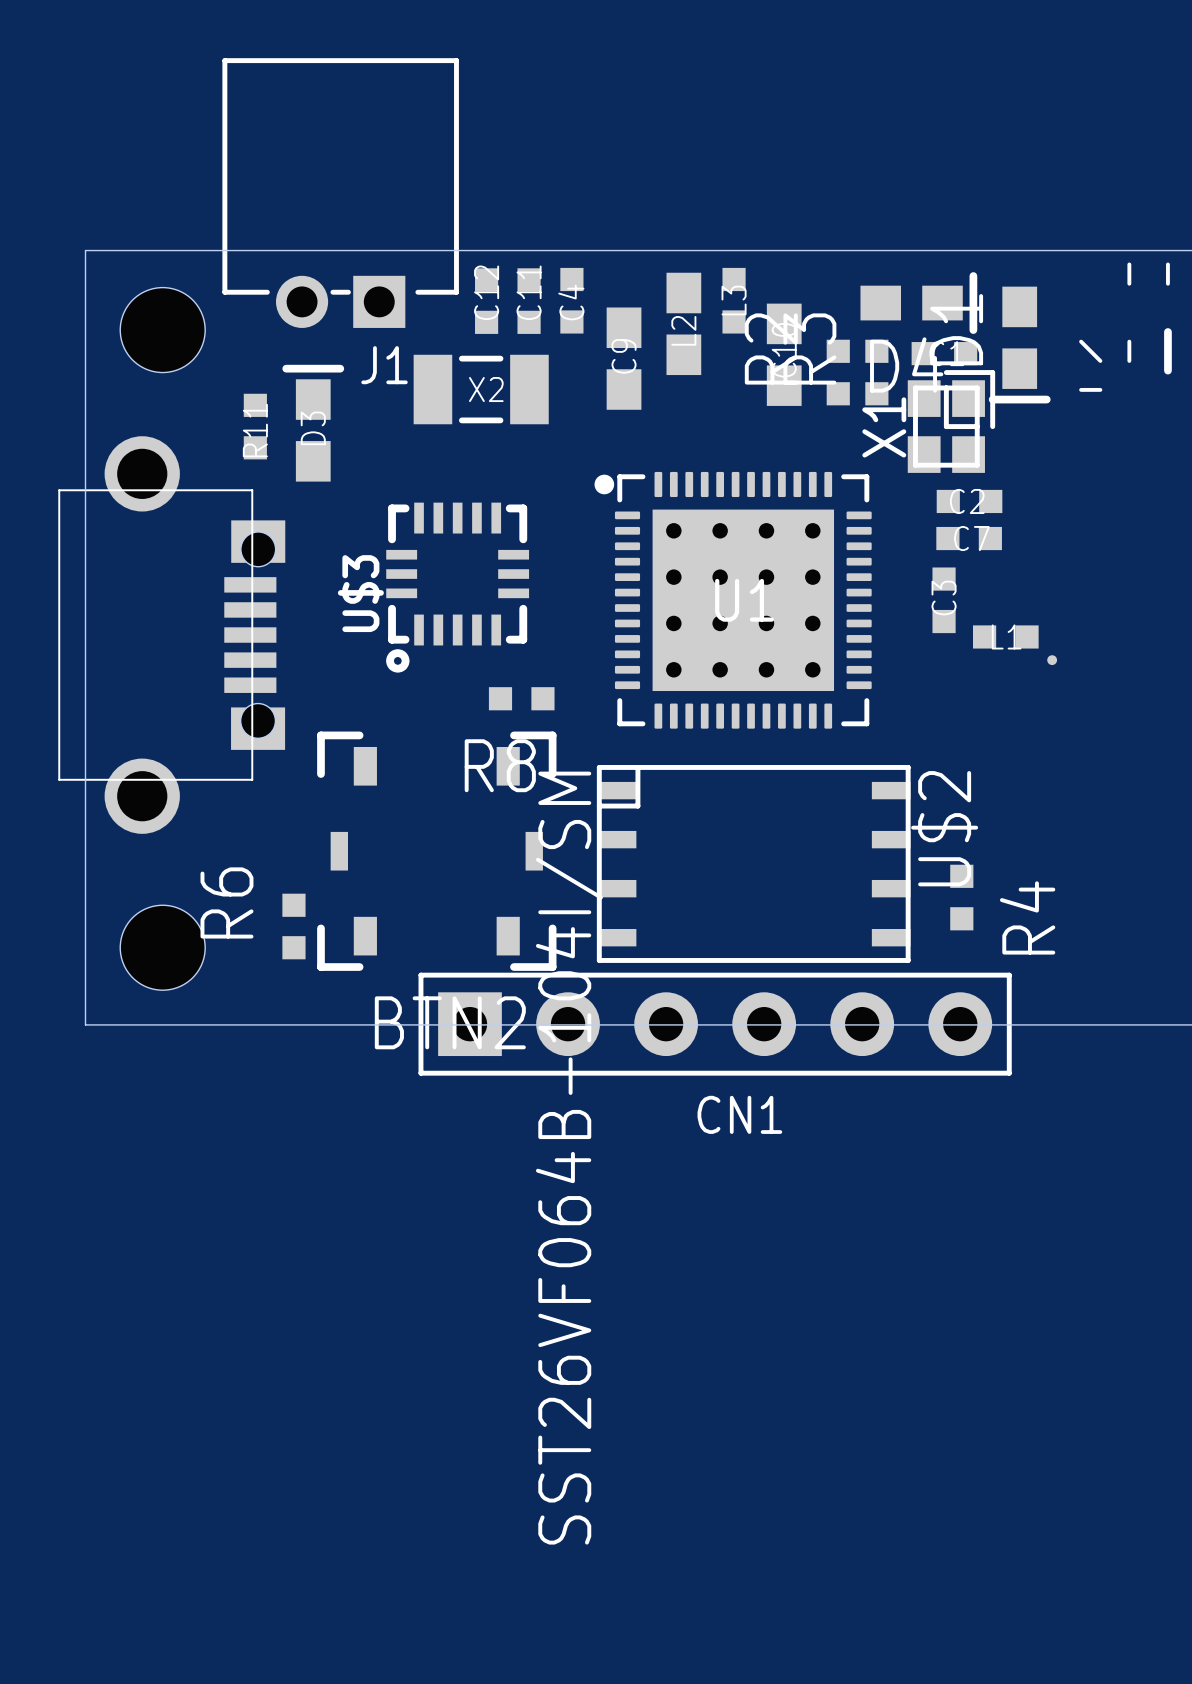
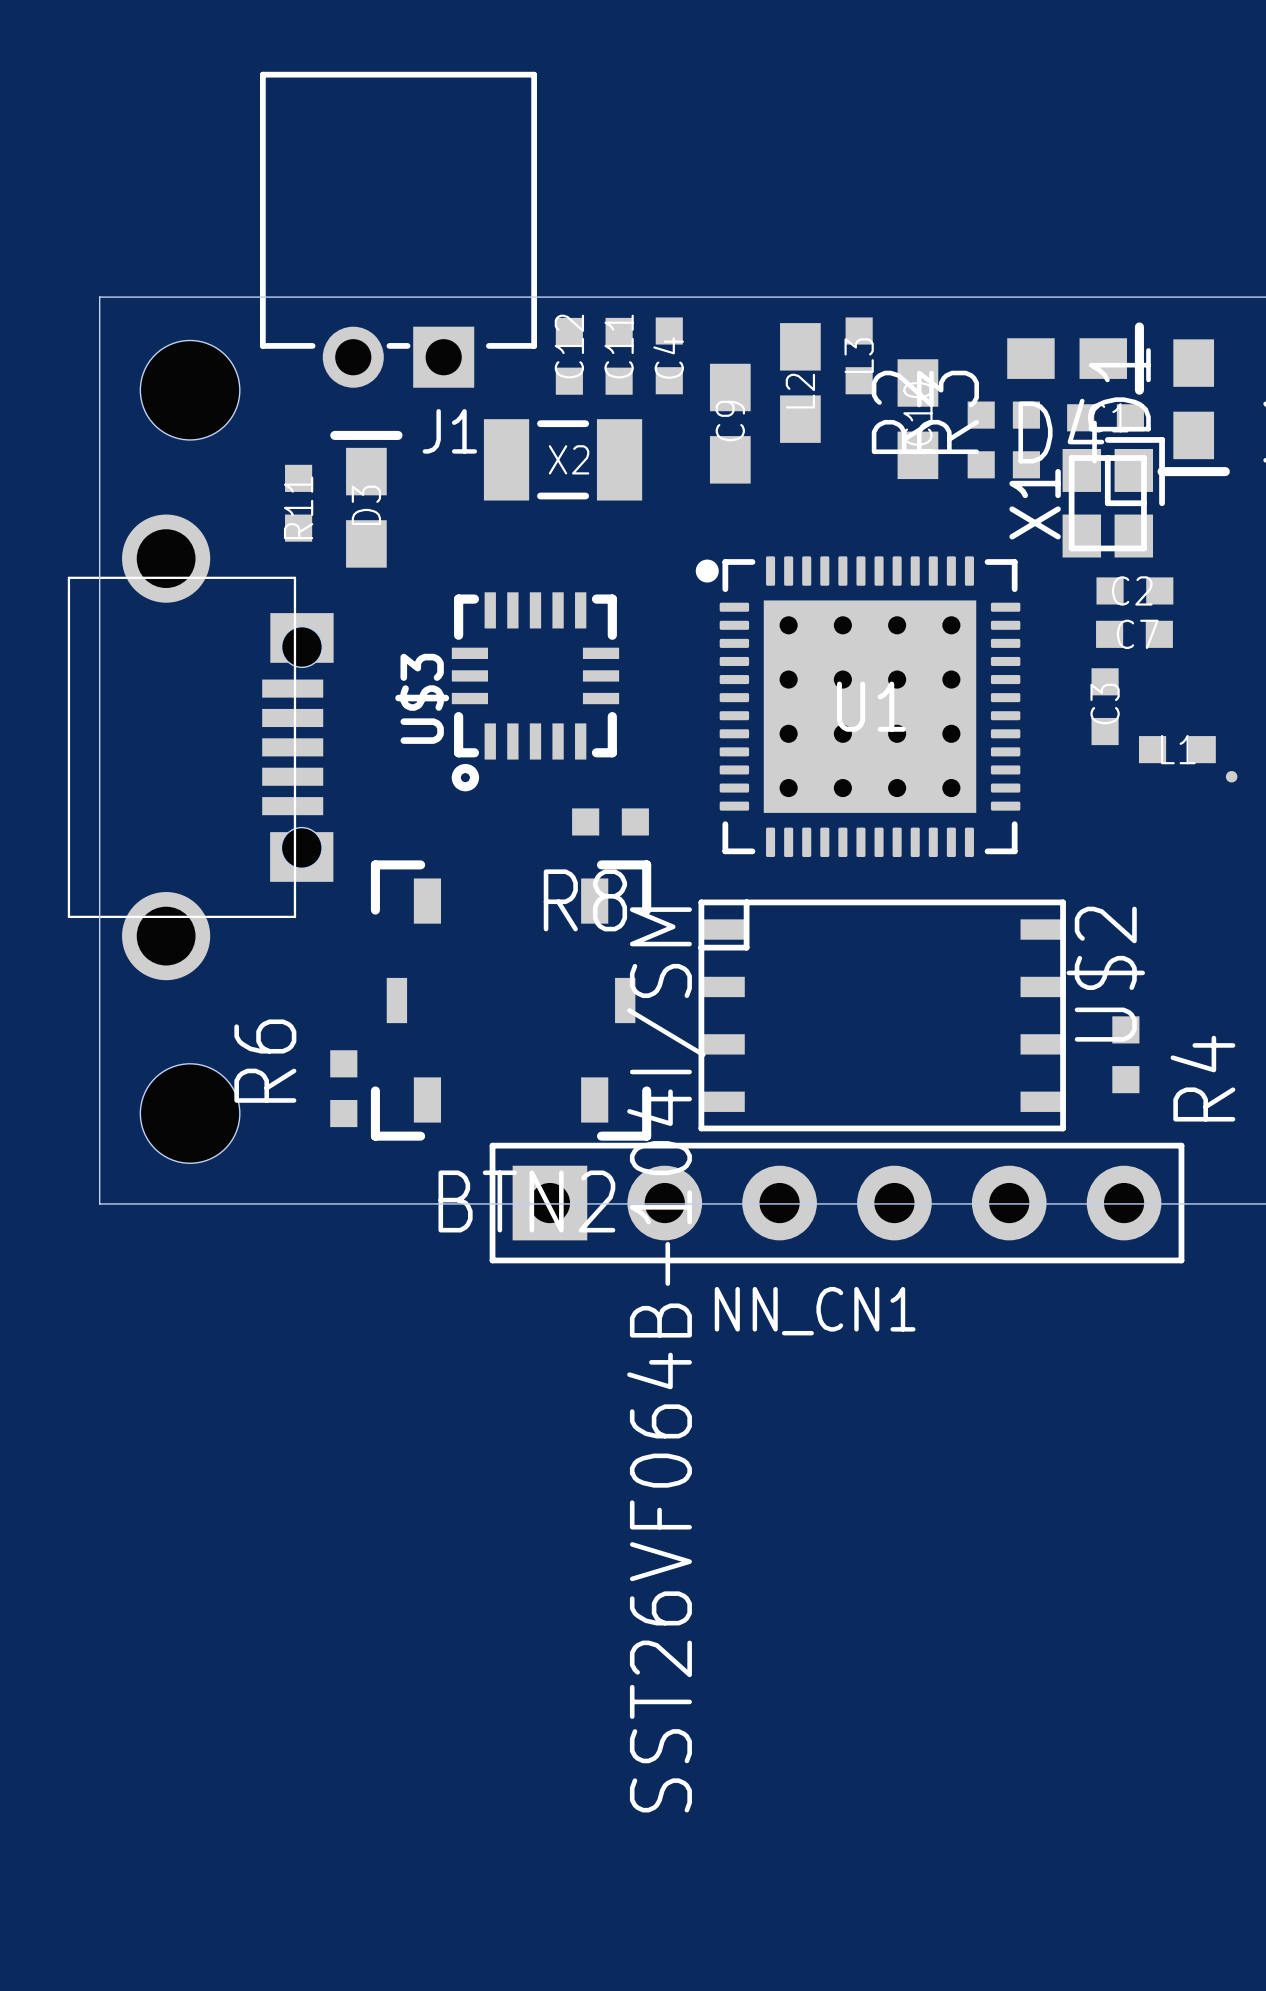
CN1 name: CN1 (739, 1114) -> NN_CN1 (815, 1311)

